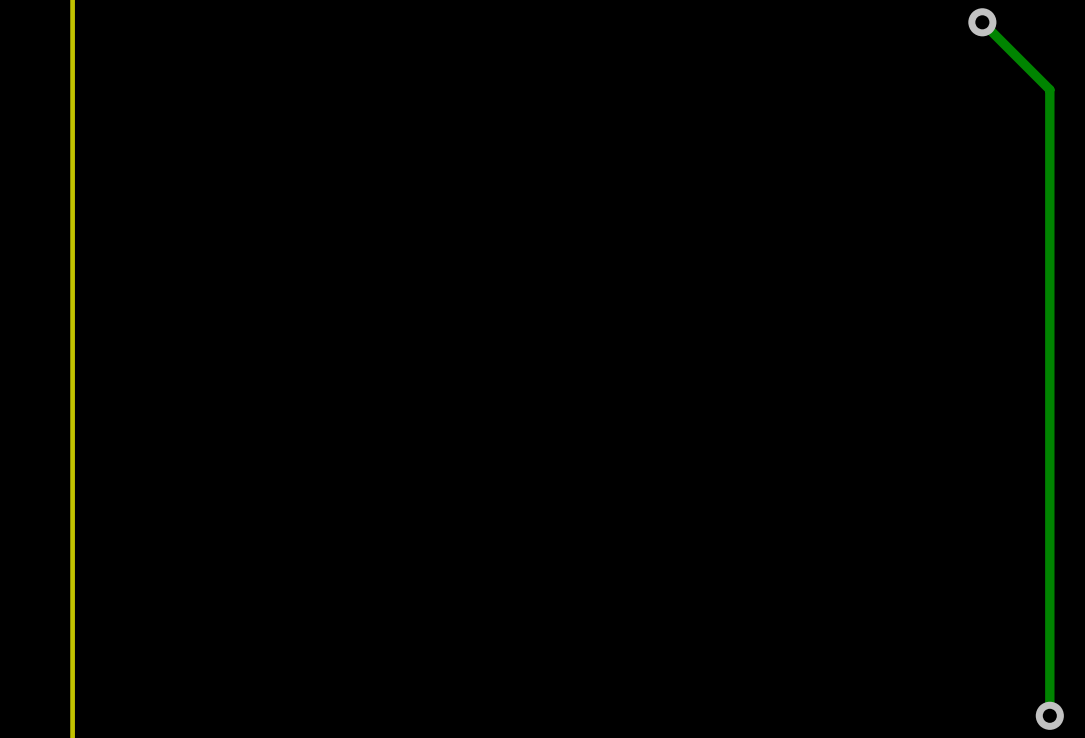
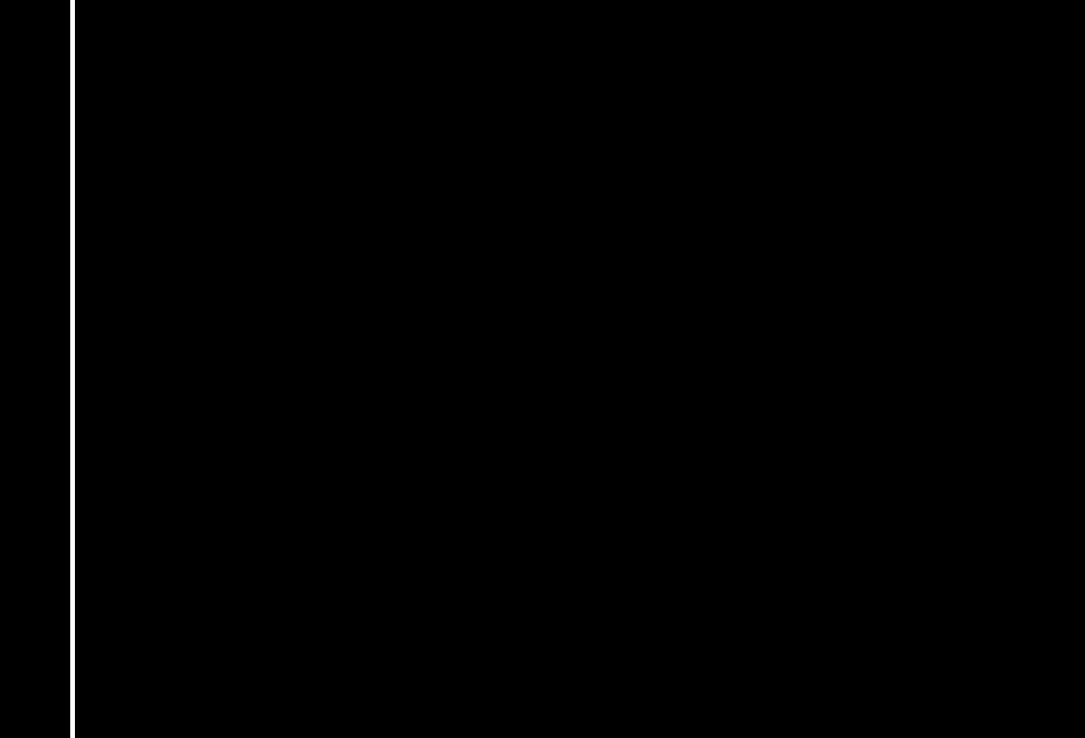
track: (982, 22) (1049, 89) (1049, 715) -> none
via: (982, 22) -> none
via: (1049, 715) -> none

